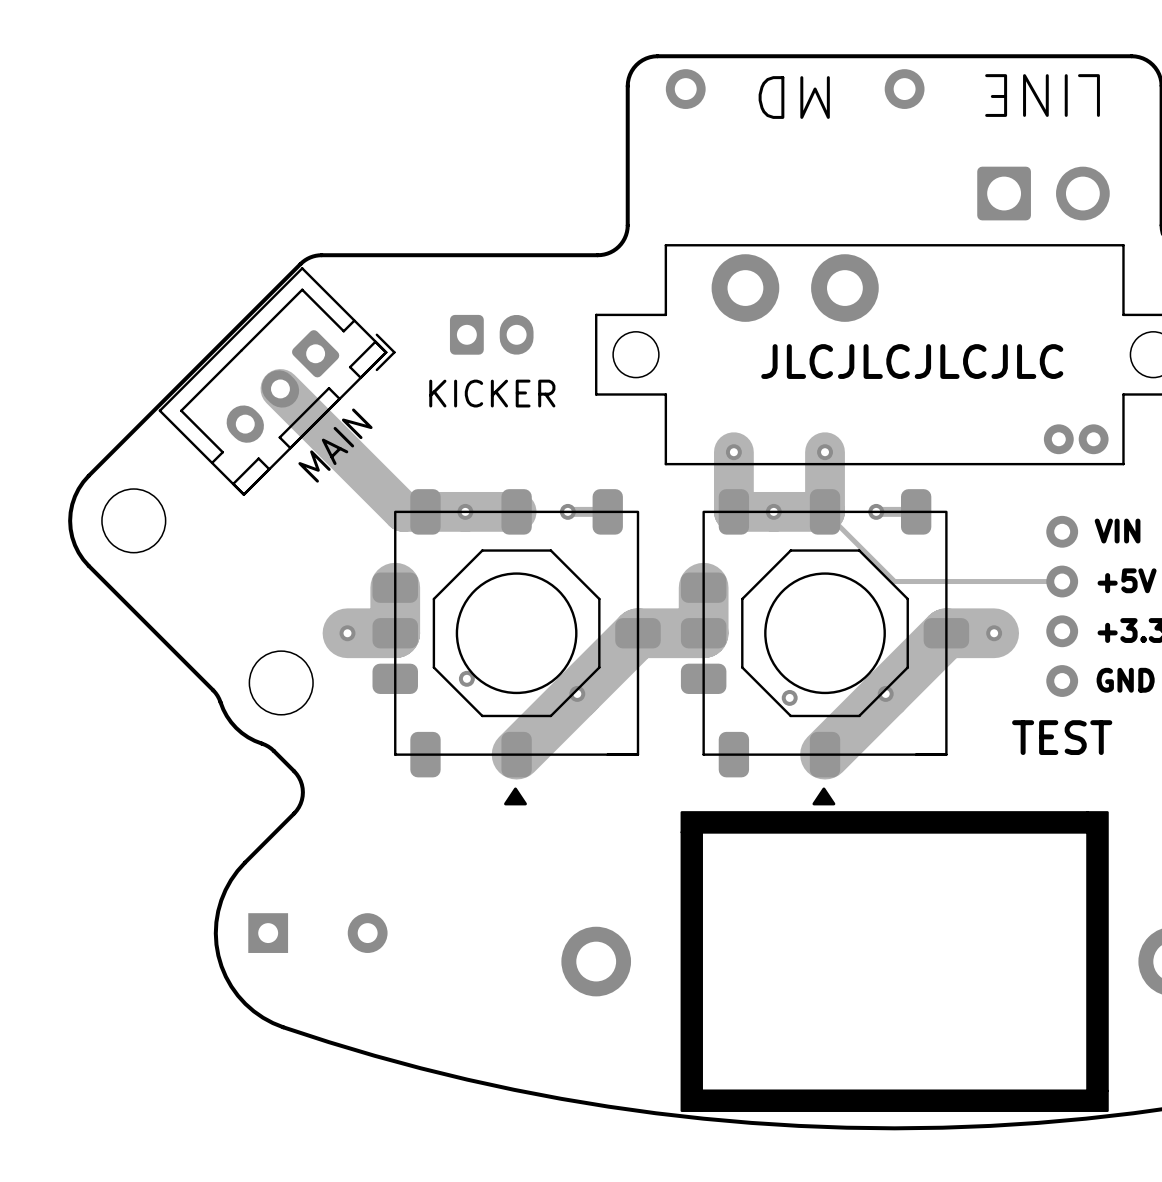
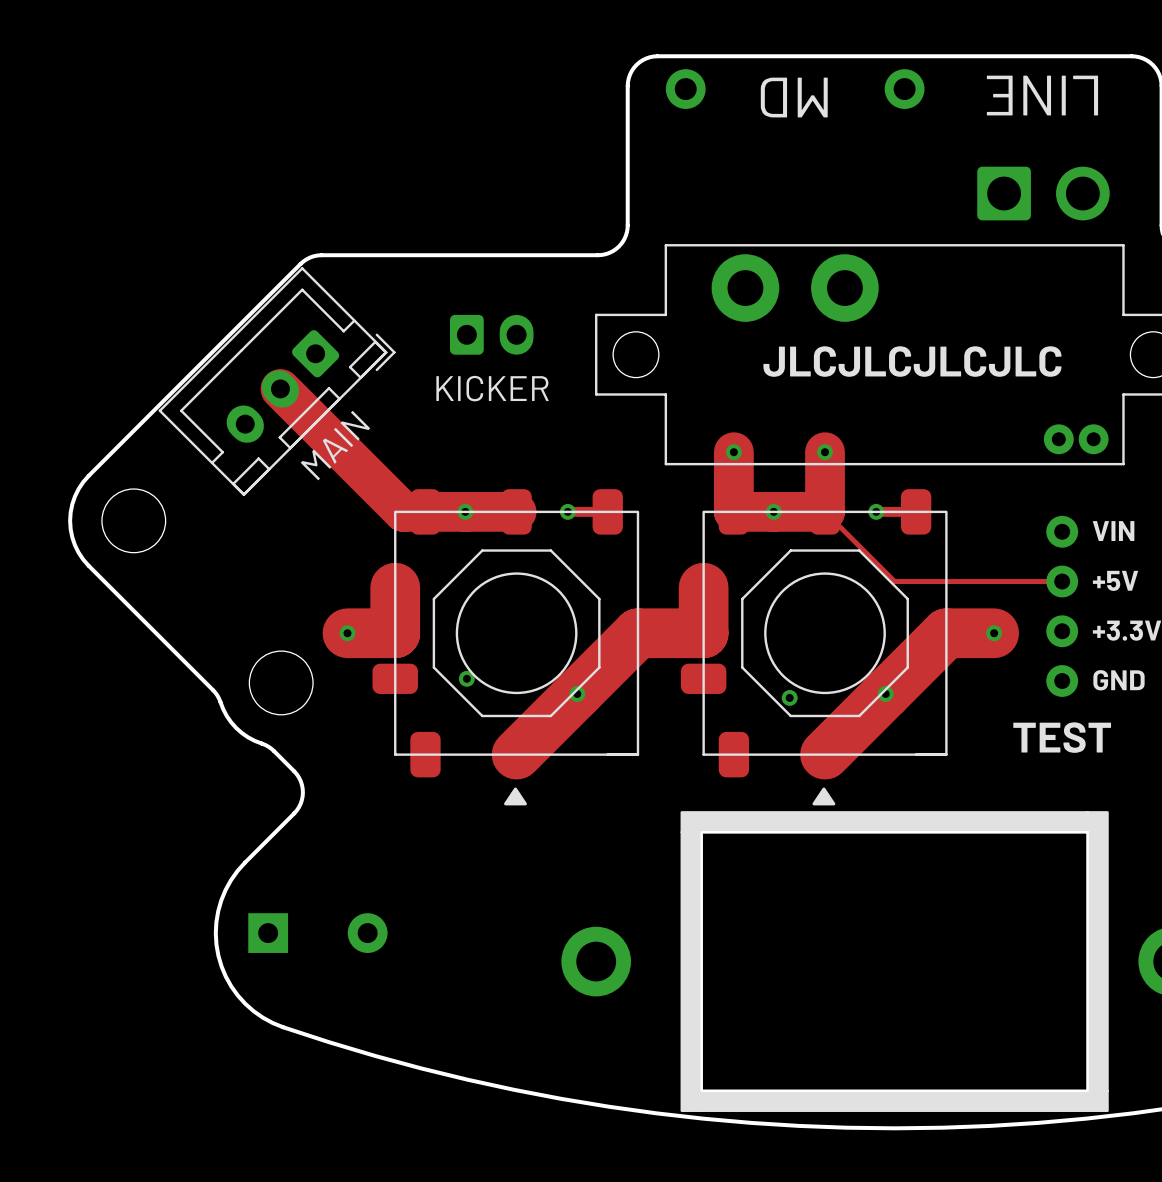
text: none -> KICKER (492, 388)
KICKER name: KICKER (492, 393) -> none

